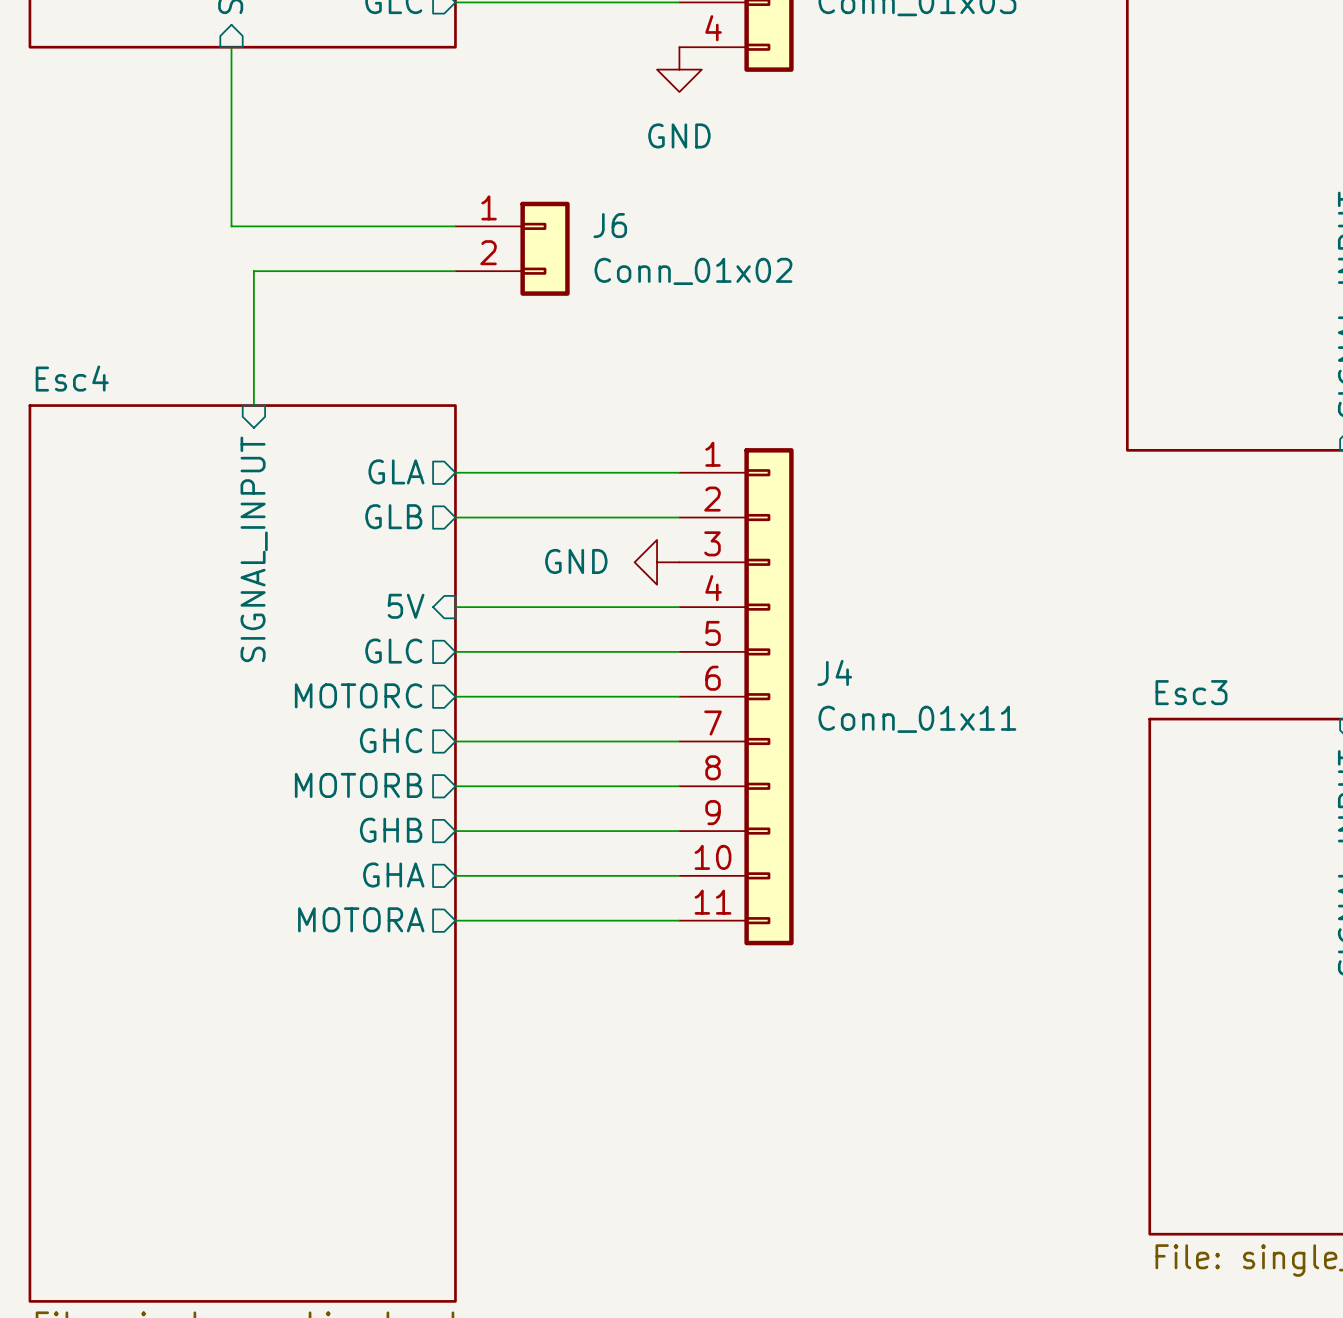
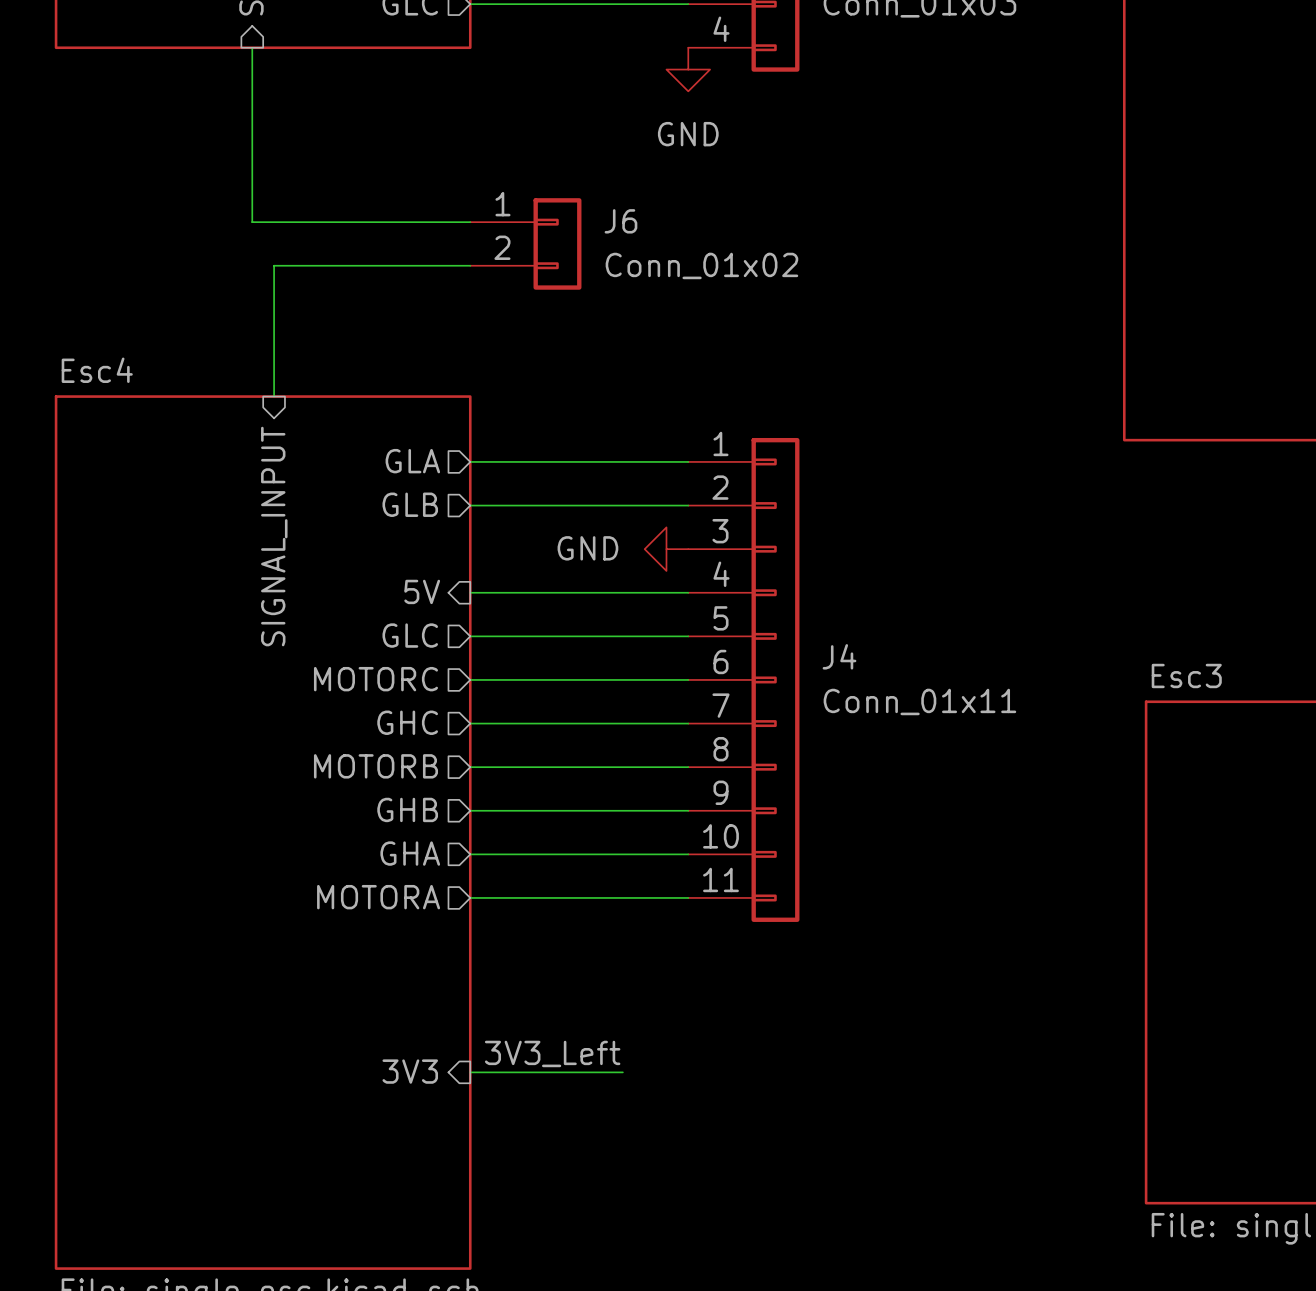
label: none -> 3V3_Left (552, 1053)
sheet pin: none -> 3V3 (410, 1071)
wire: none -> (470, 1072) (622, 1072)

